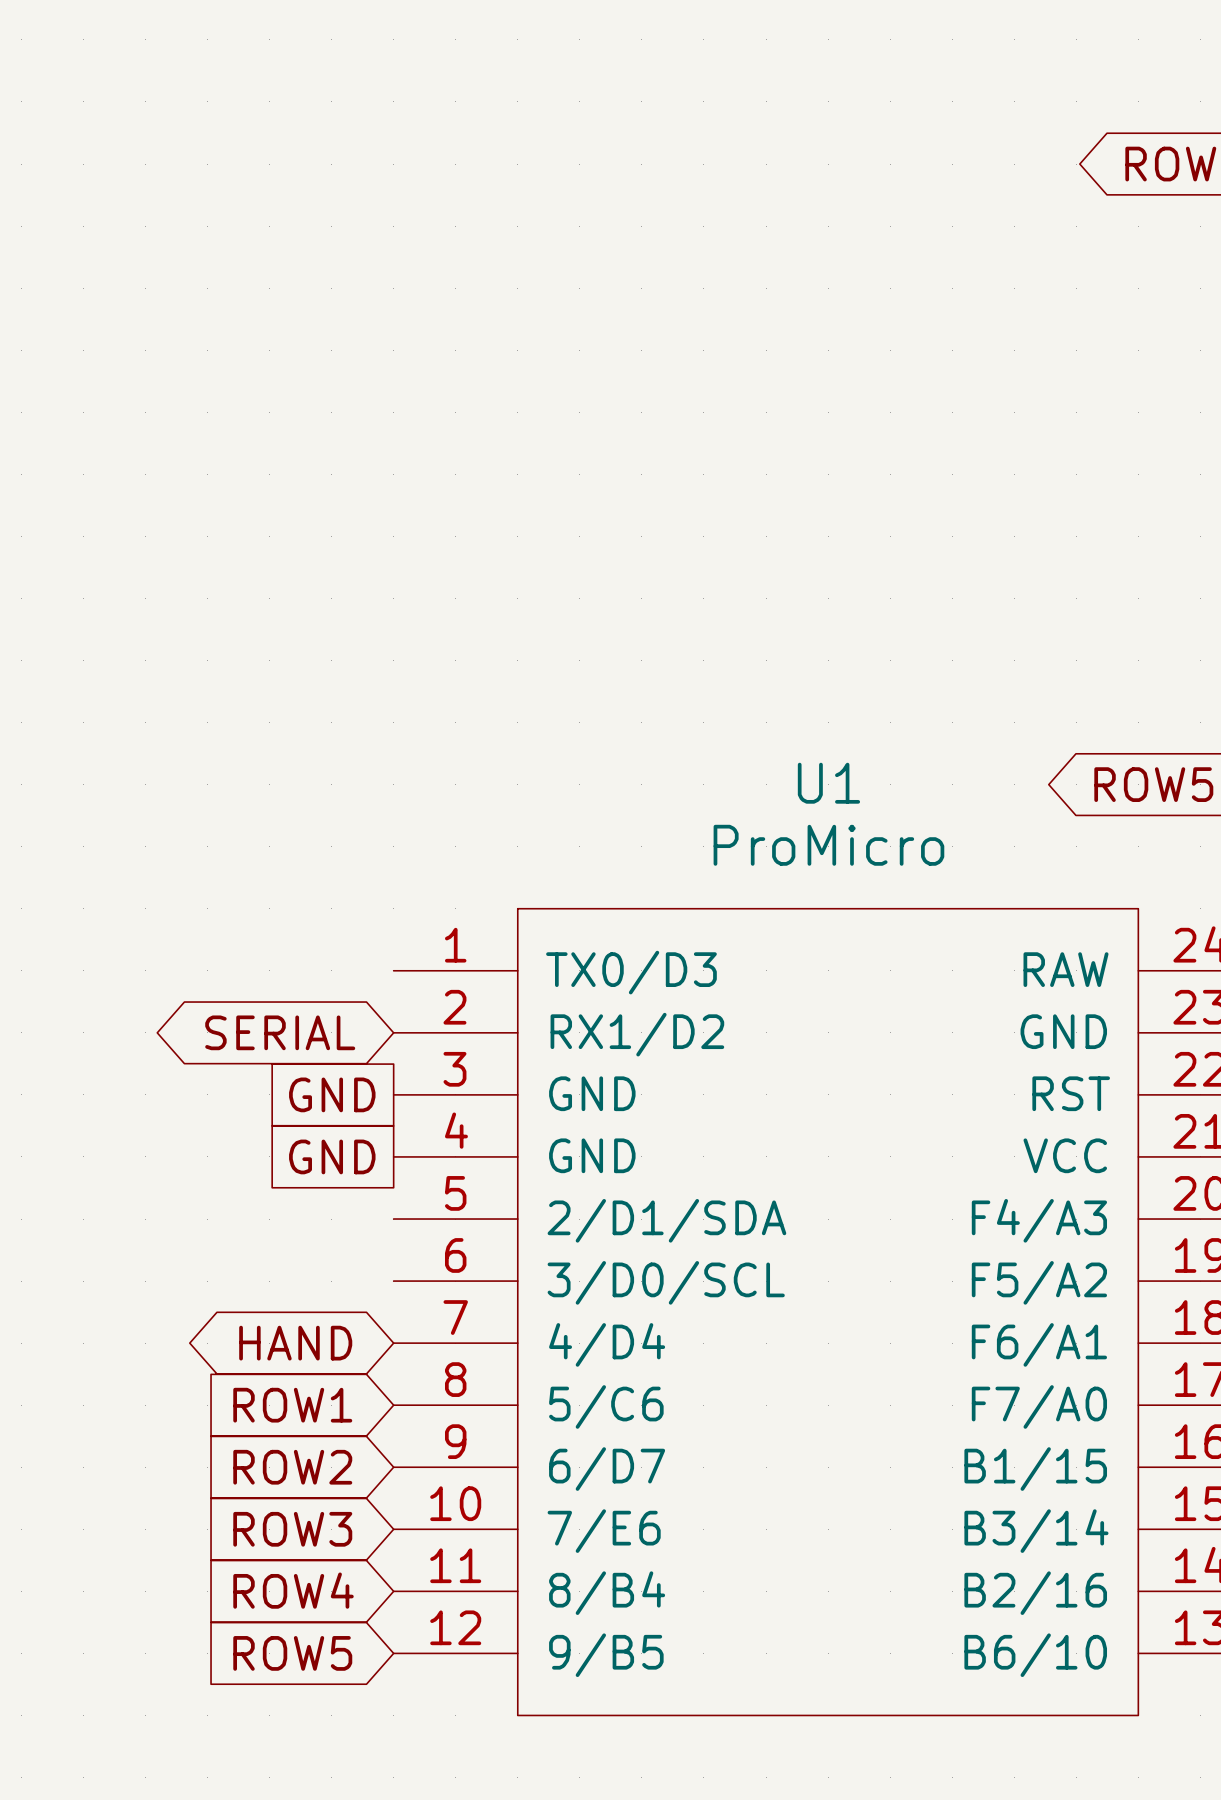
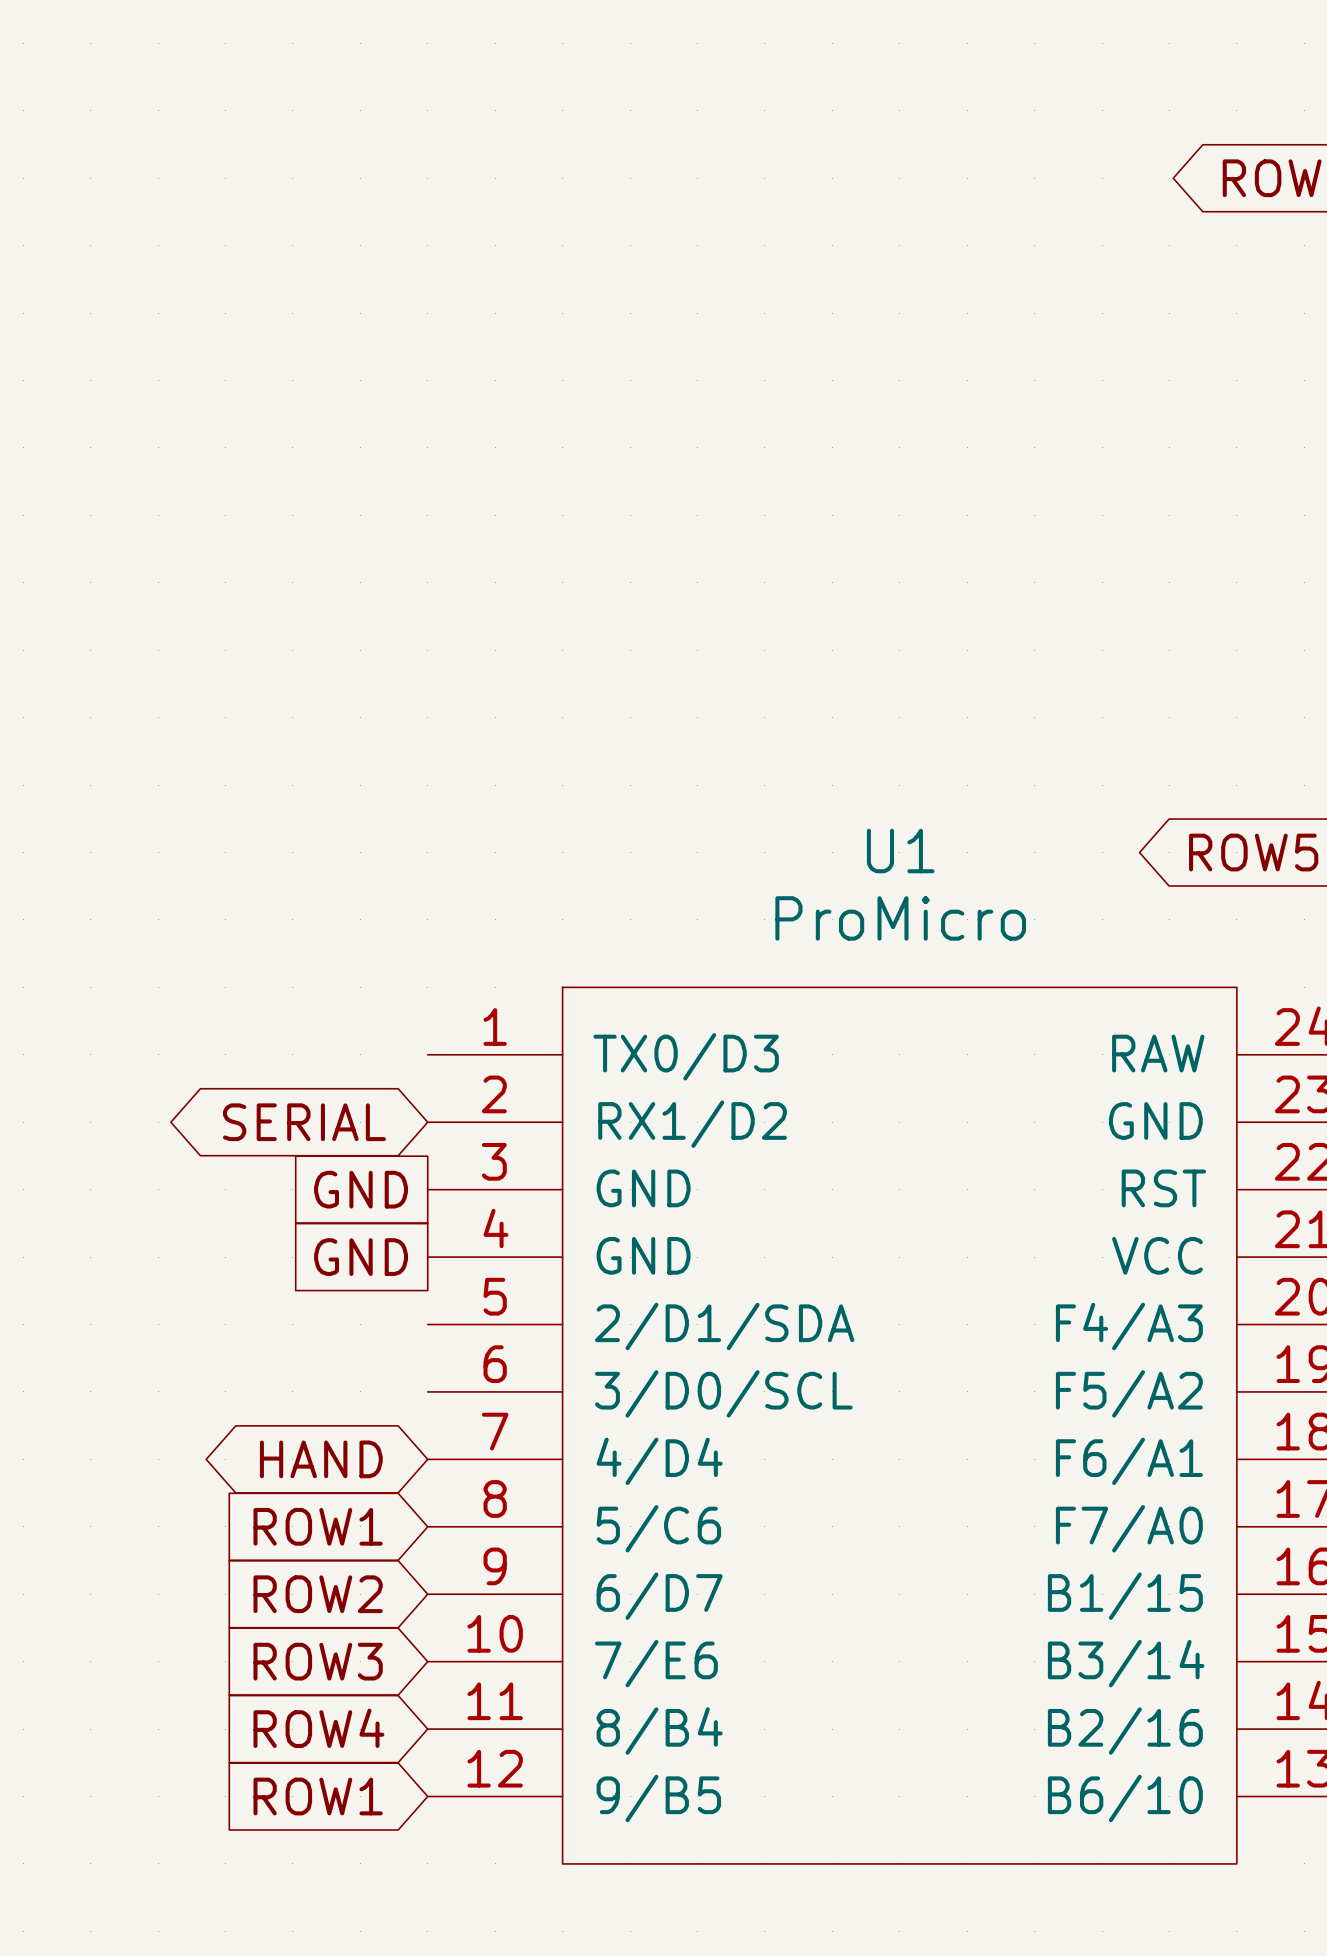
global label: ROW5 (292, 1653) -> ROW1 (318, 1796)

